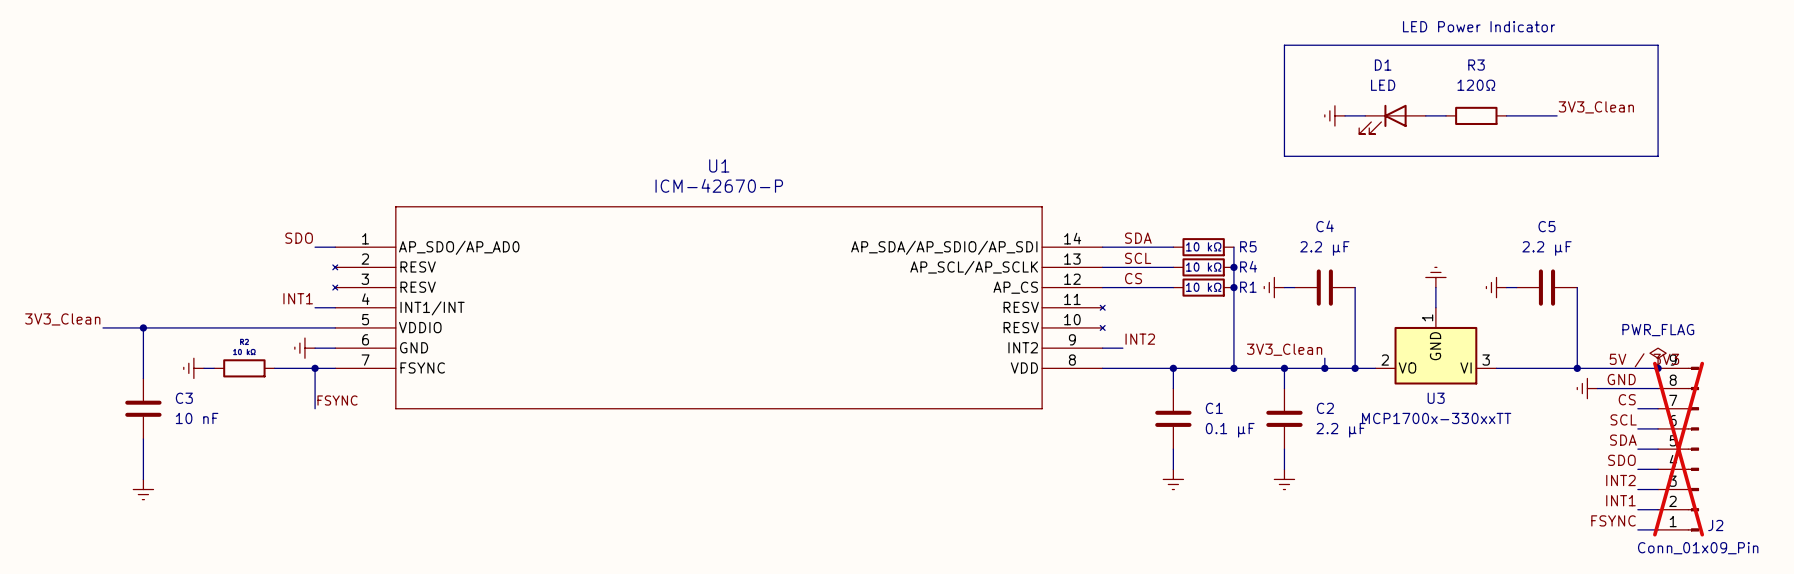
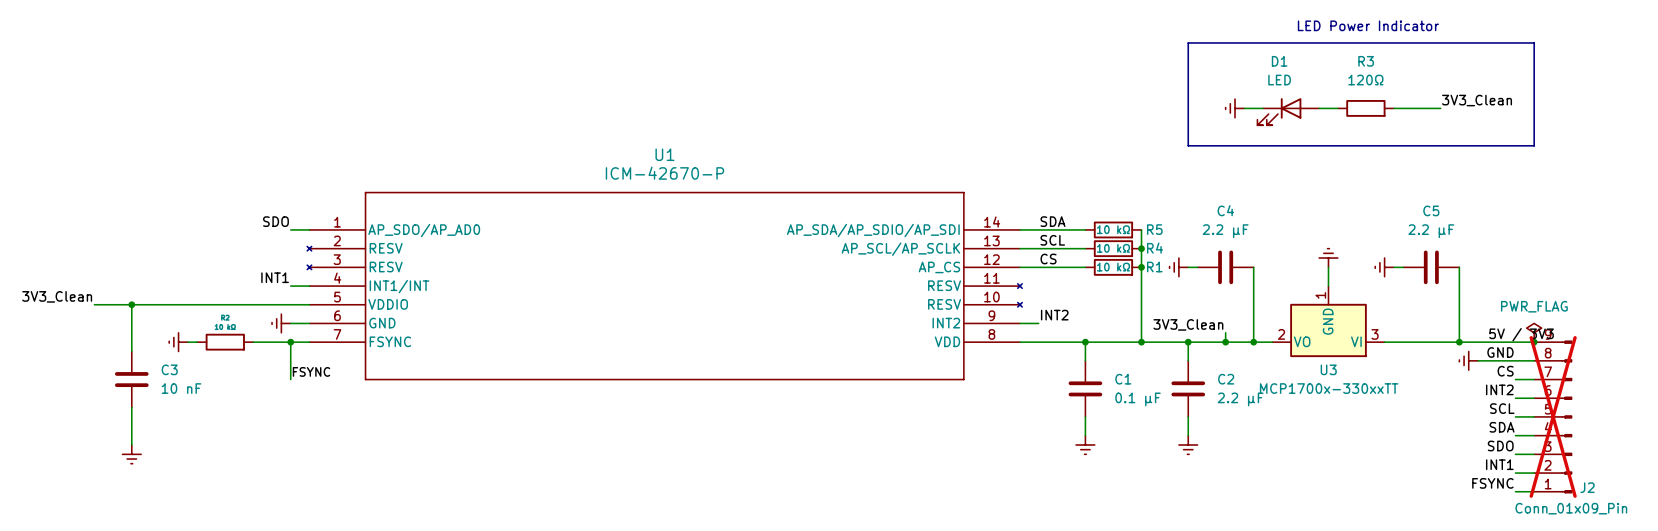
label: SCL (1623, 419) -> INT2 (1499, 389)
label: SDA (1623, 440) -> SCL (1502, 408)
label: SDO (1621, 460) -> SDA (1502, 427)
label: INT2 (1620, 480) -> SDO (1500, 446)

